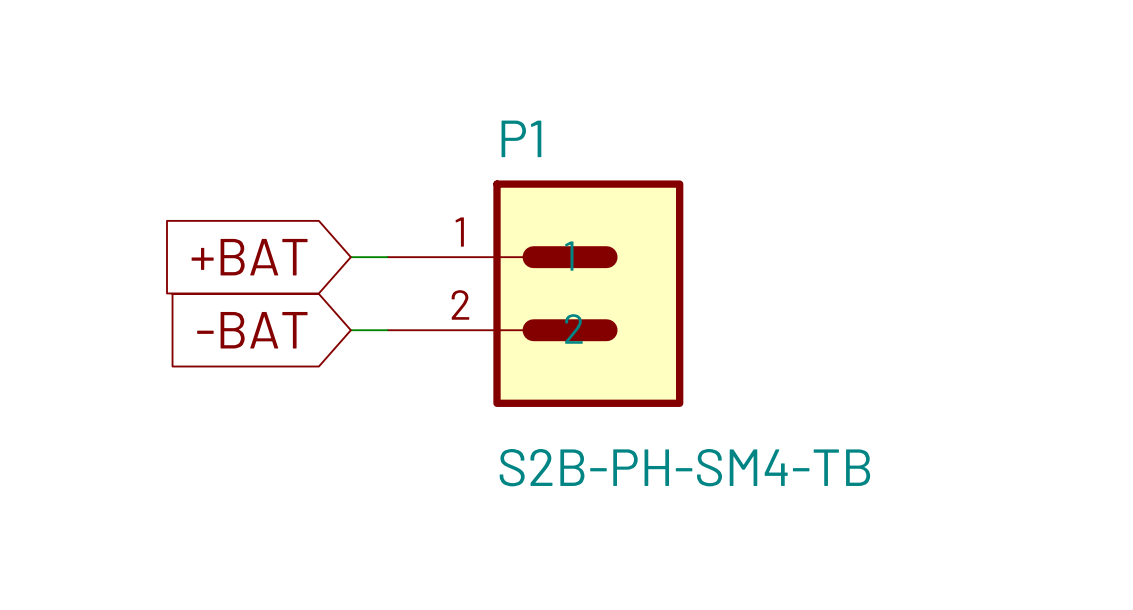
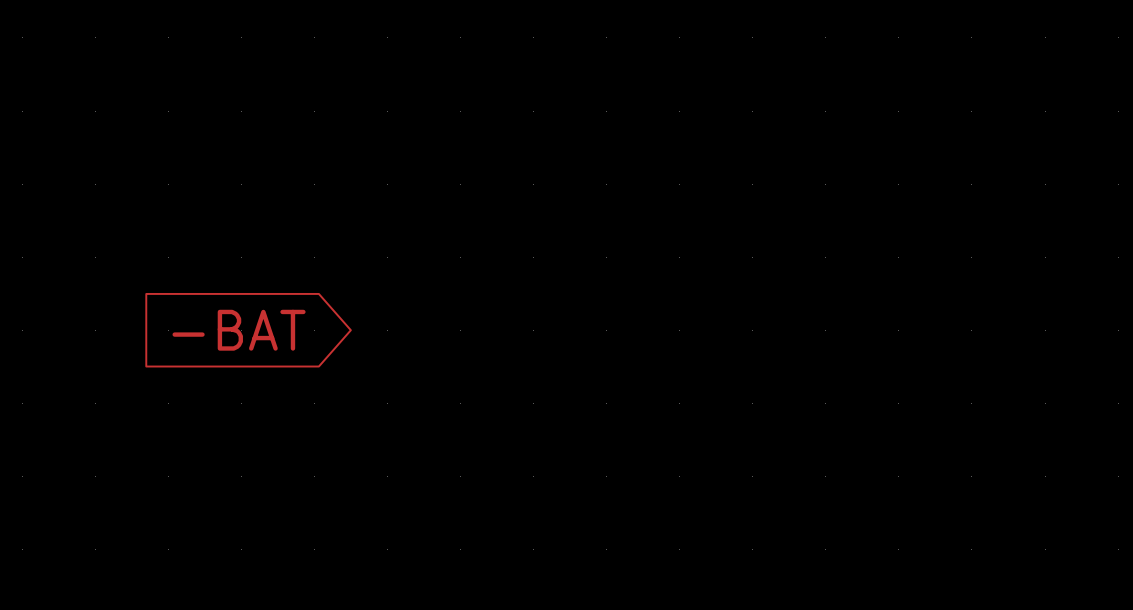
global label: +BAT (249, 257) -> none
wire: (350, 257) (387, 257) -> none
P1: S2B-PH-SM4-TB (535, 293) -> none
wire: (350, 330) (387, 330) -> none

